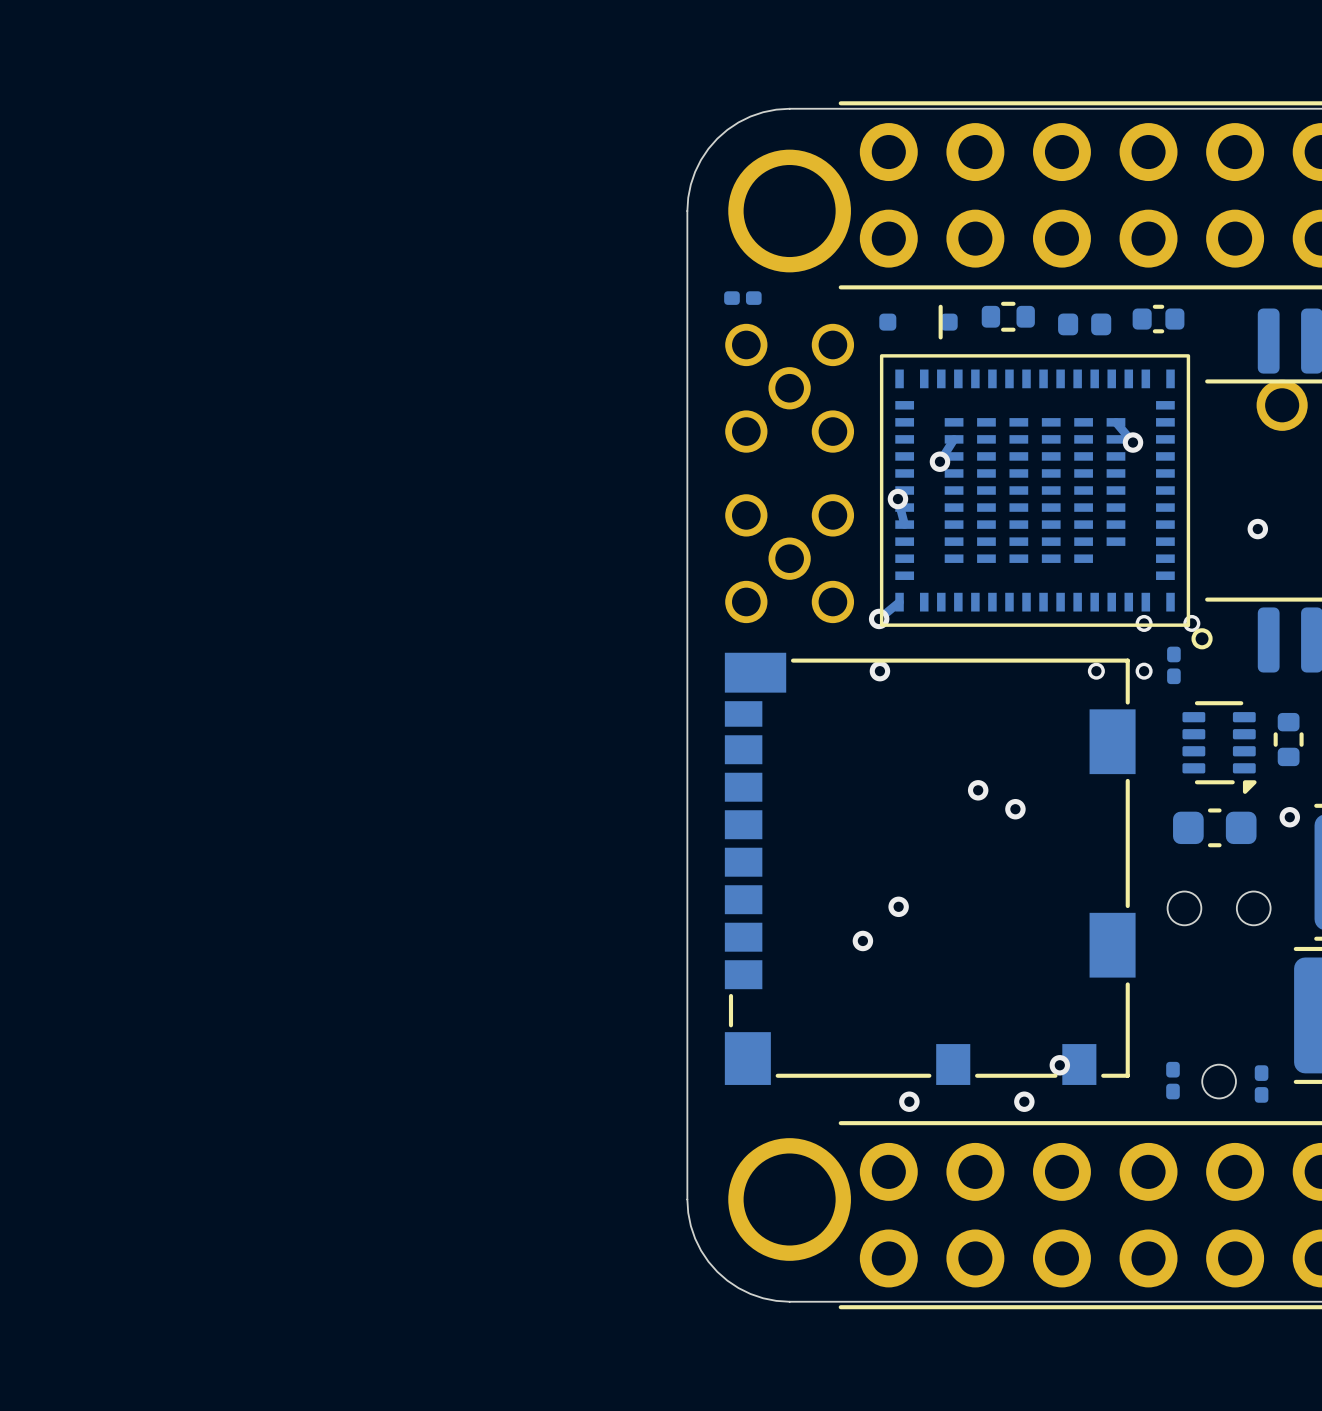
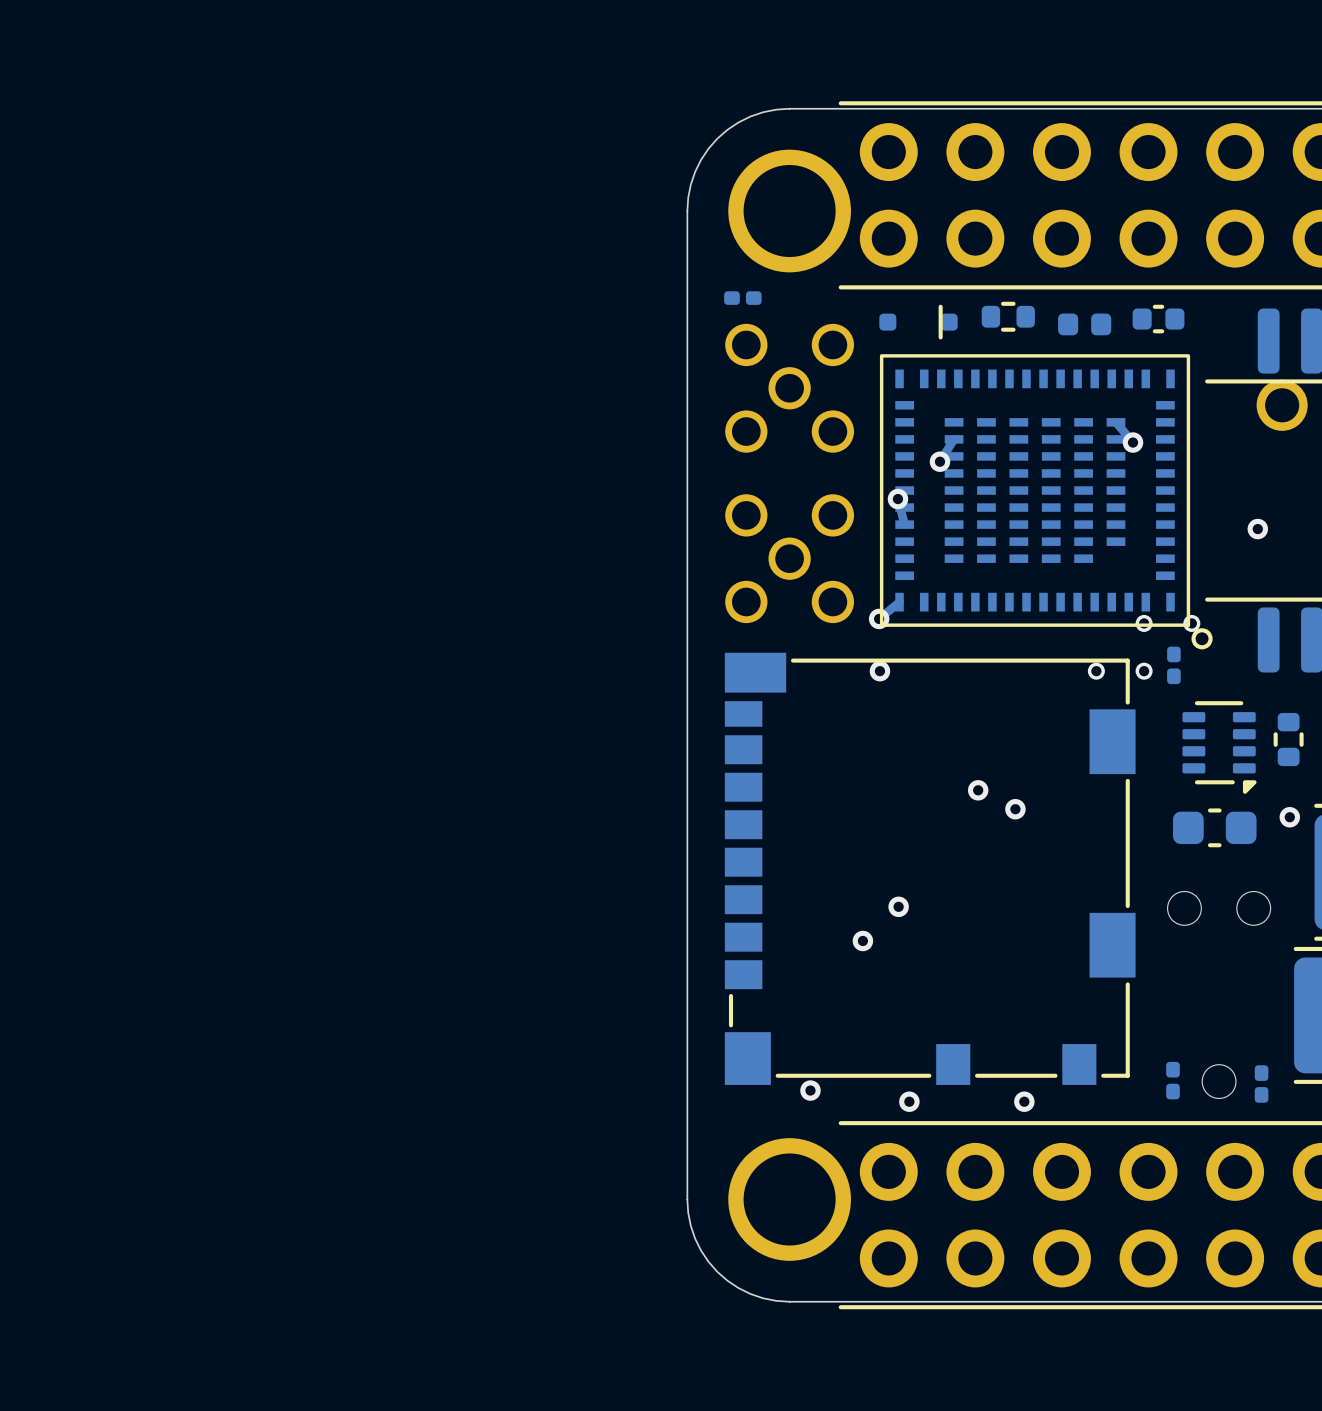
via: (1059, 1065) -> none
via: none -> (810, 1090)

